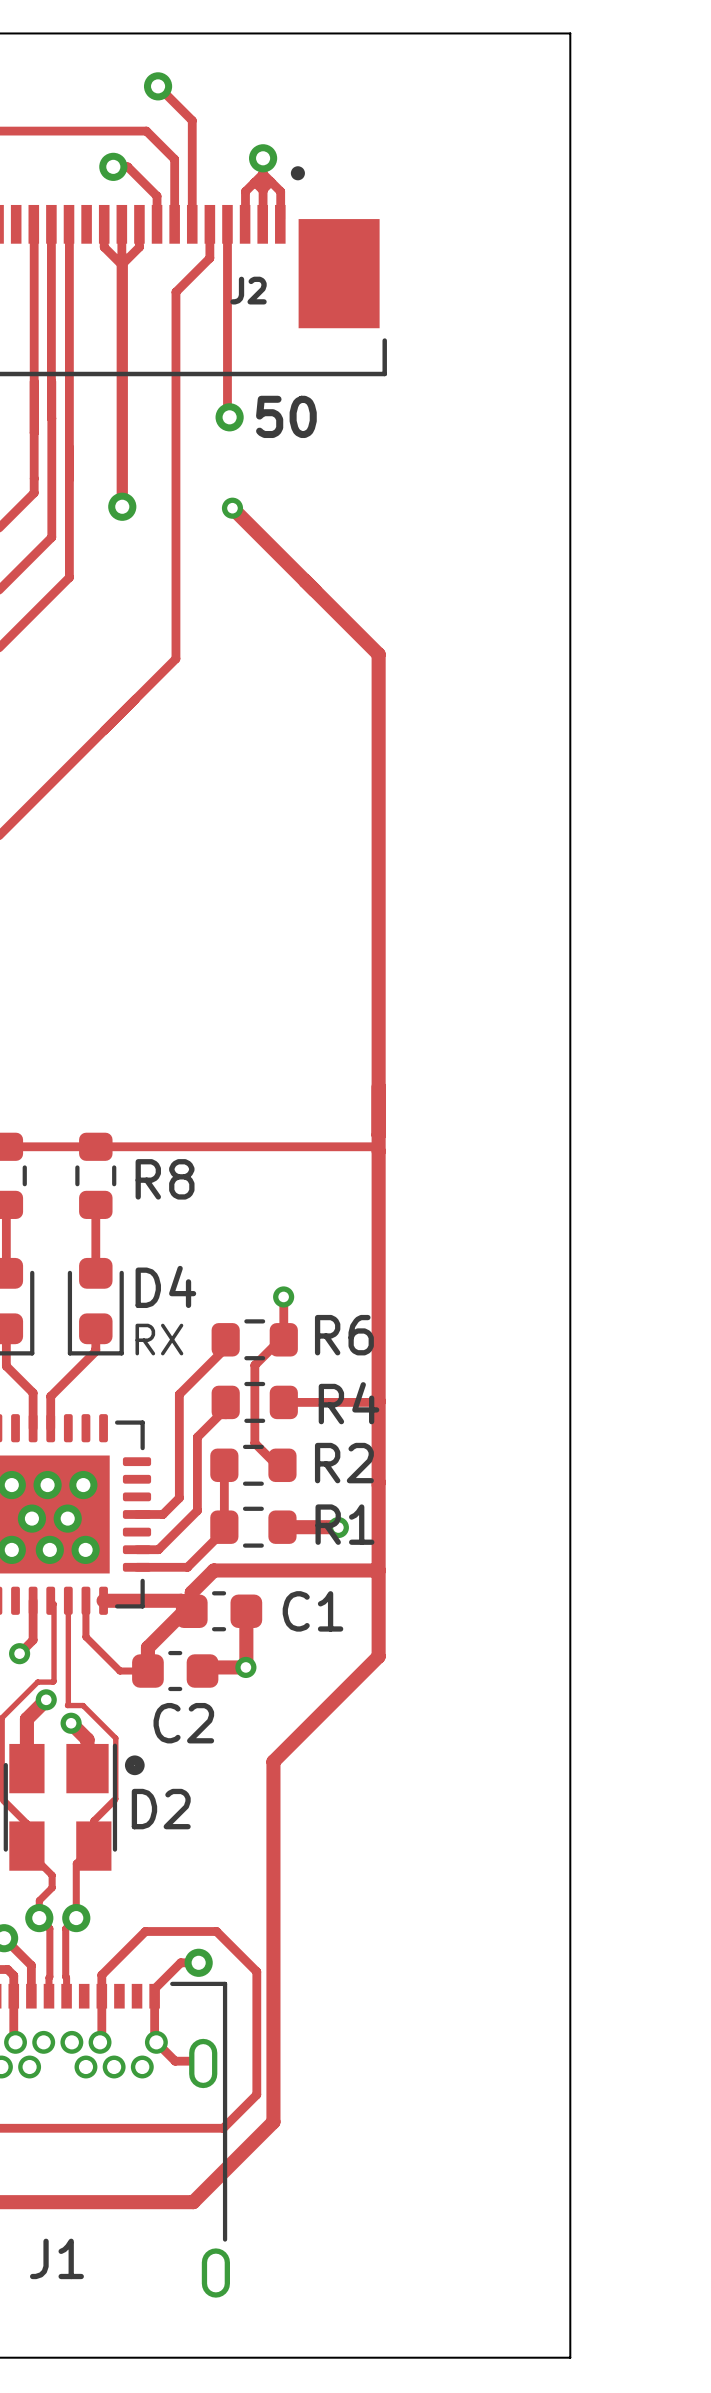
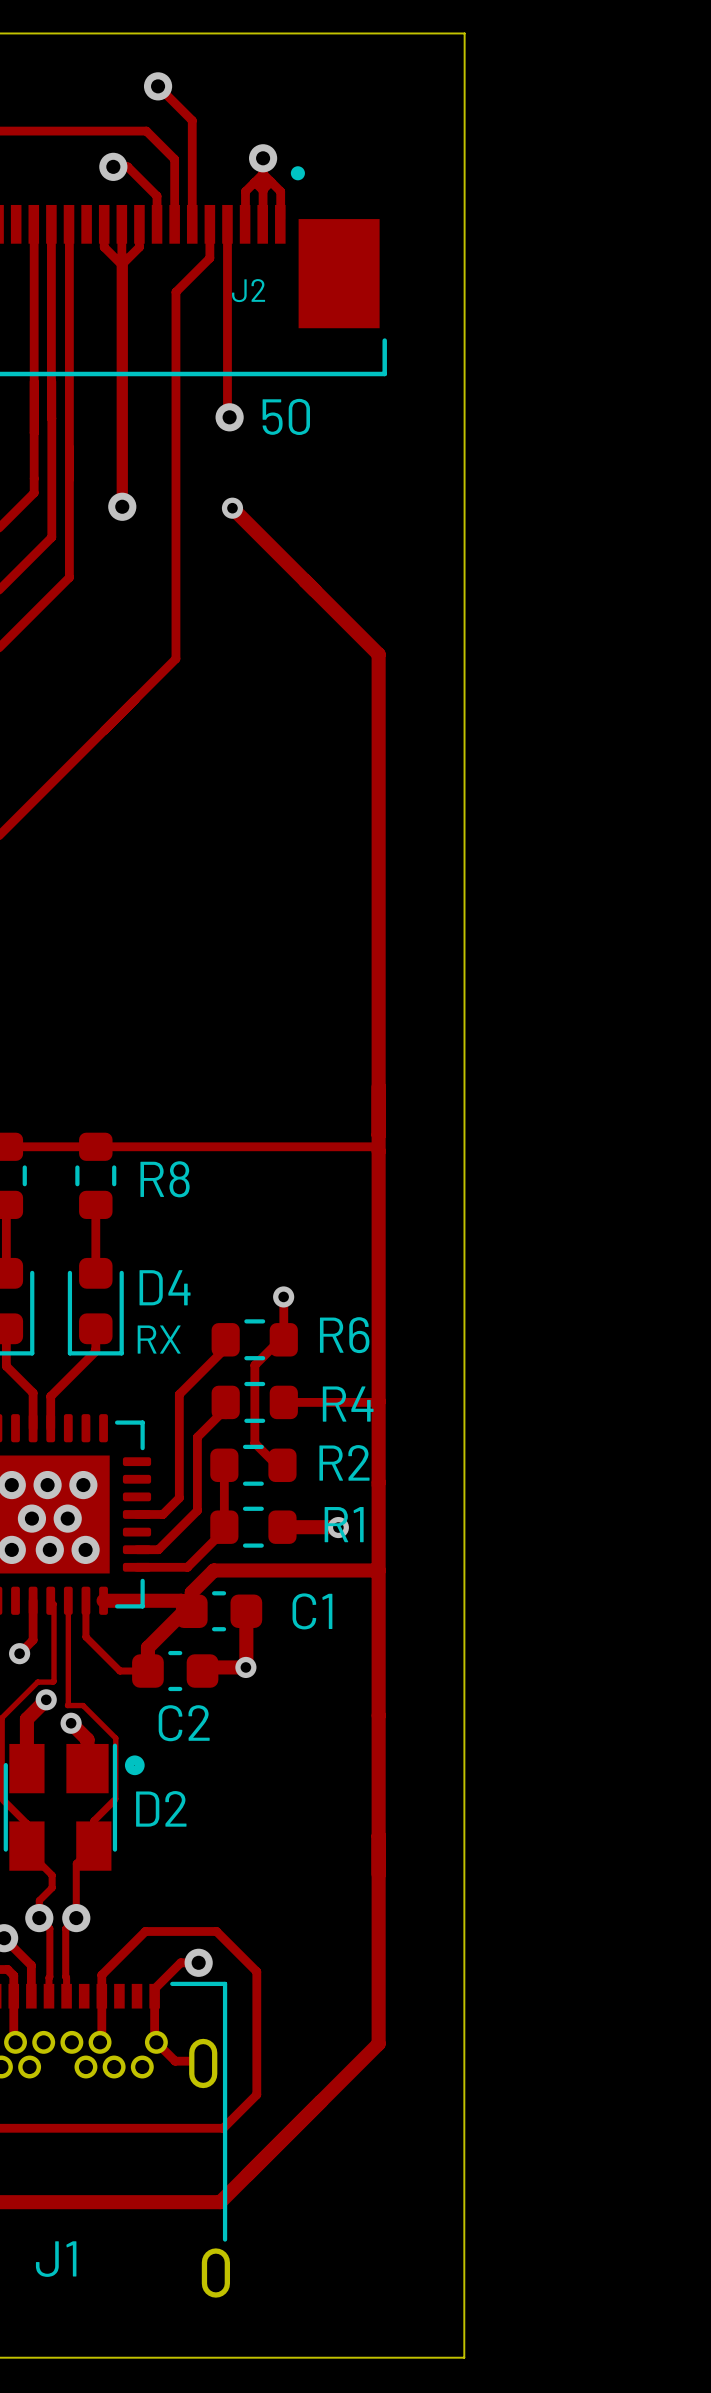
board edge: (464, 33) (570, 33) (570, 2357) (464, 2357) -> (464, 33) (464, 2357)
track: (378, 1656) (273, 1761) (273, 2122) (193, 2202) -> (378, 1656) (378, 2043) (220, 2202) (193, 2202)

